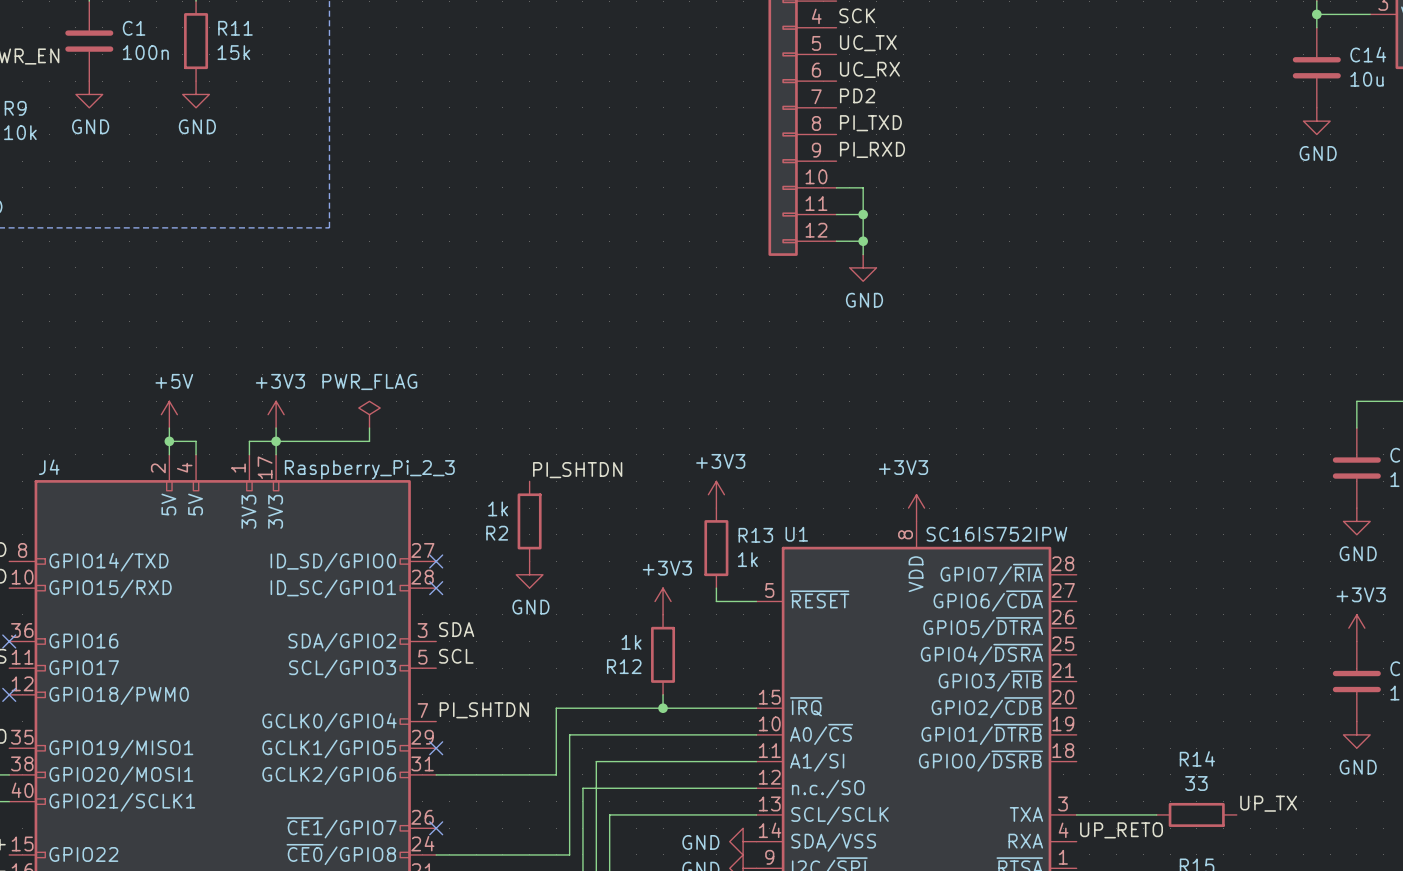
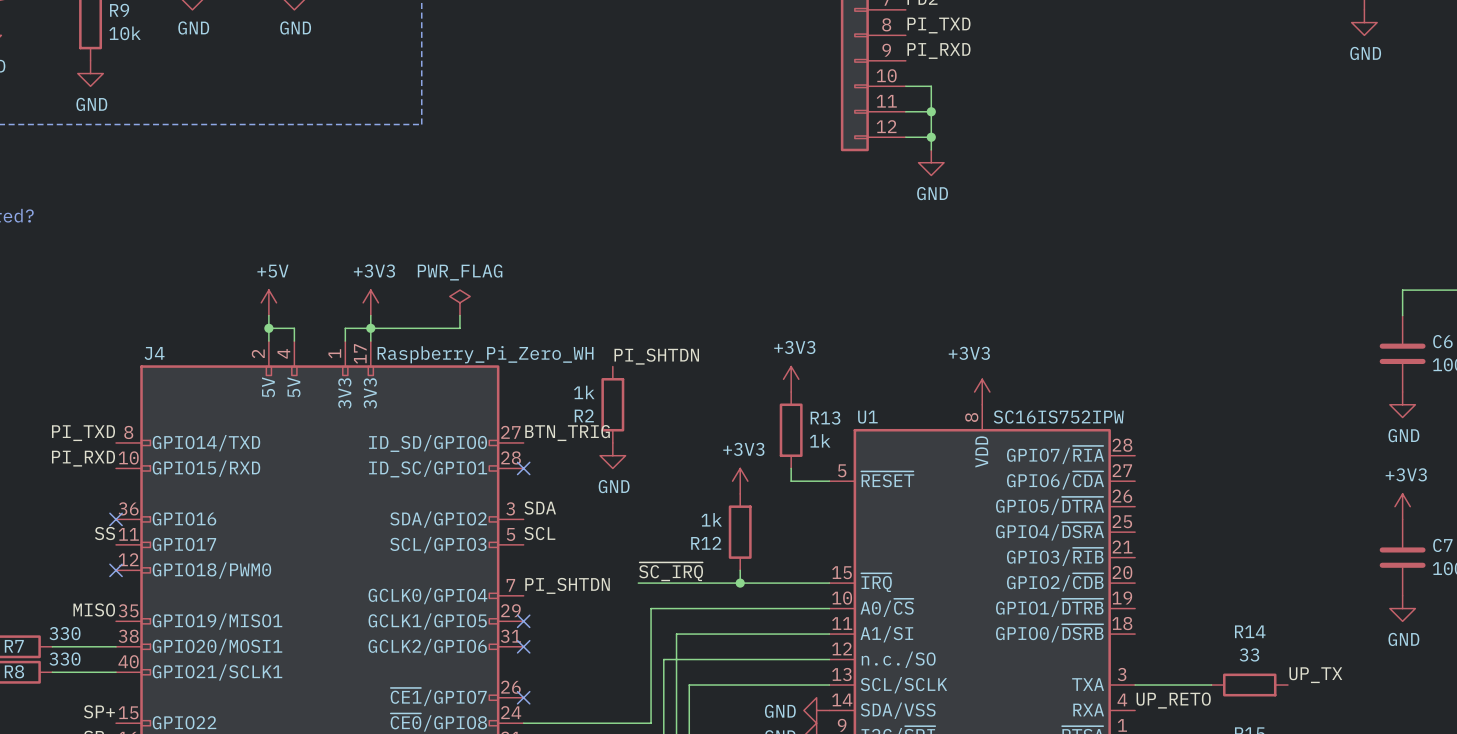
J4 value: Raspberry_Pi_2_3 (369, 469) -> Raspberry_Pi_Zero_WH (485, 354)
label: none -> BTN_TRIG (567, 433)
no-connect mark: (436, 561) -> none
label: none -> ~{SC_IRQ} (671, 571)
wire: (556, 708) (556, 774) (436, 774) -> none
no-connect mark: none -> (523, 646)

